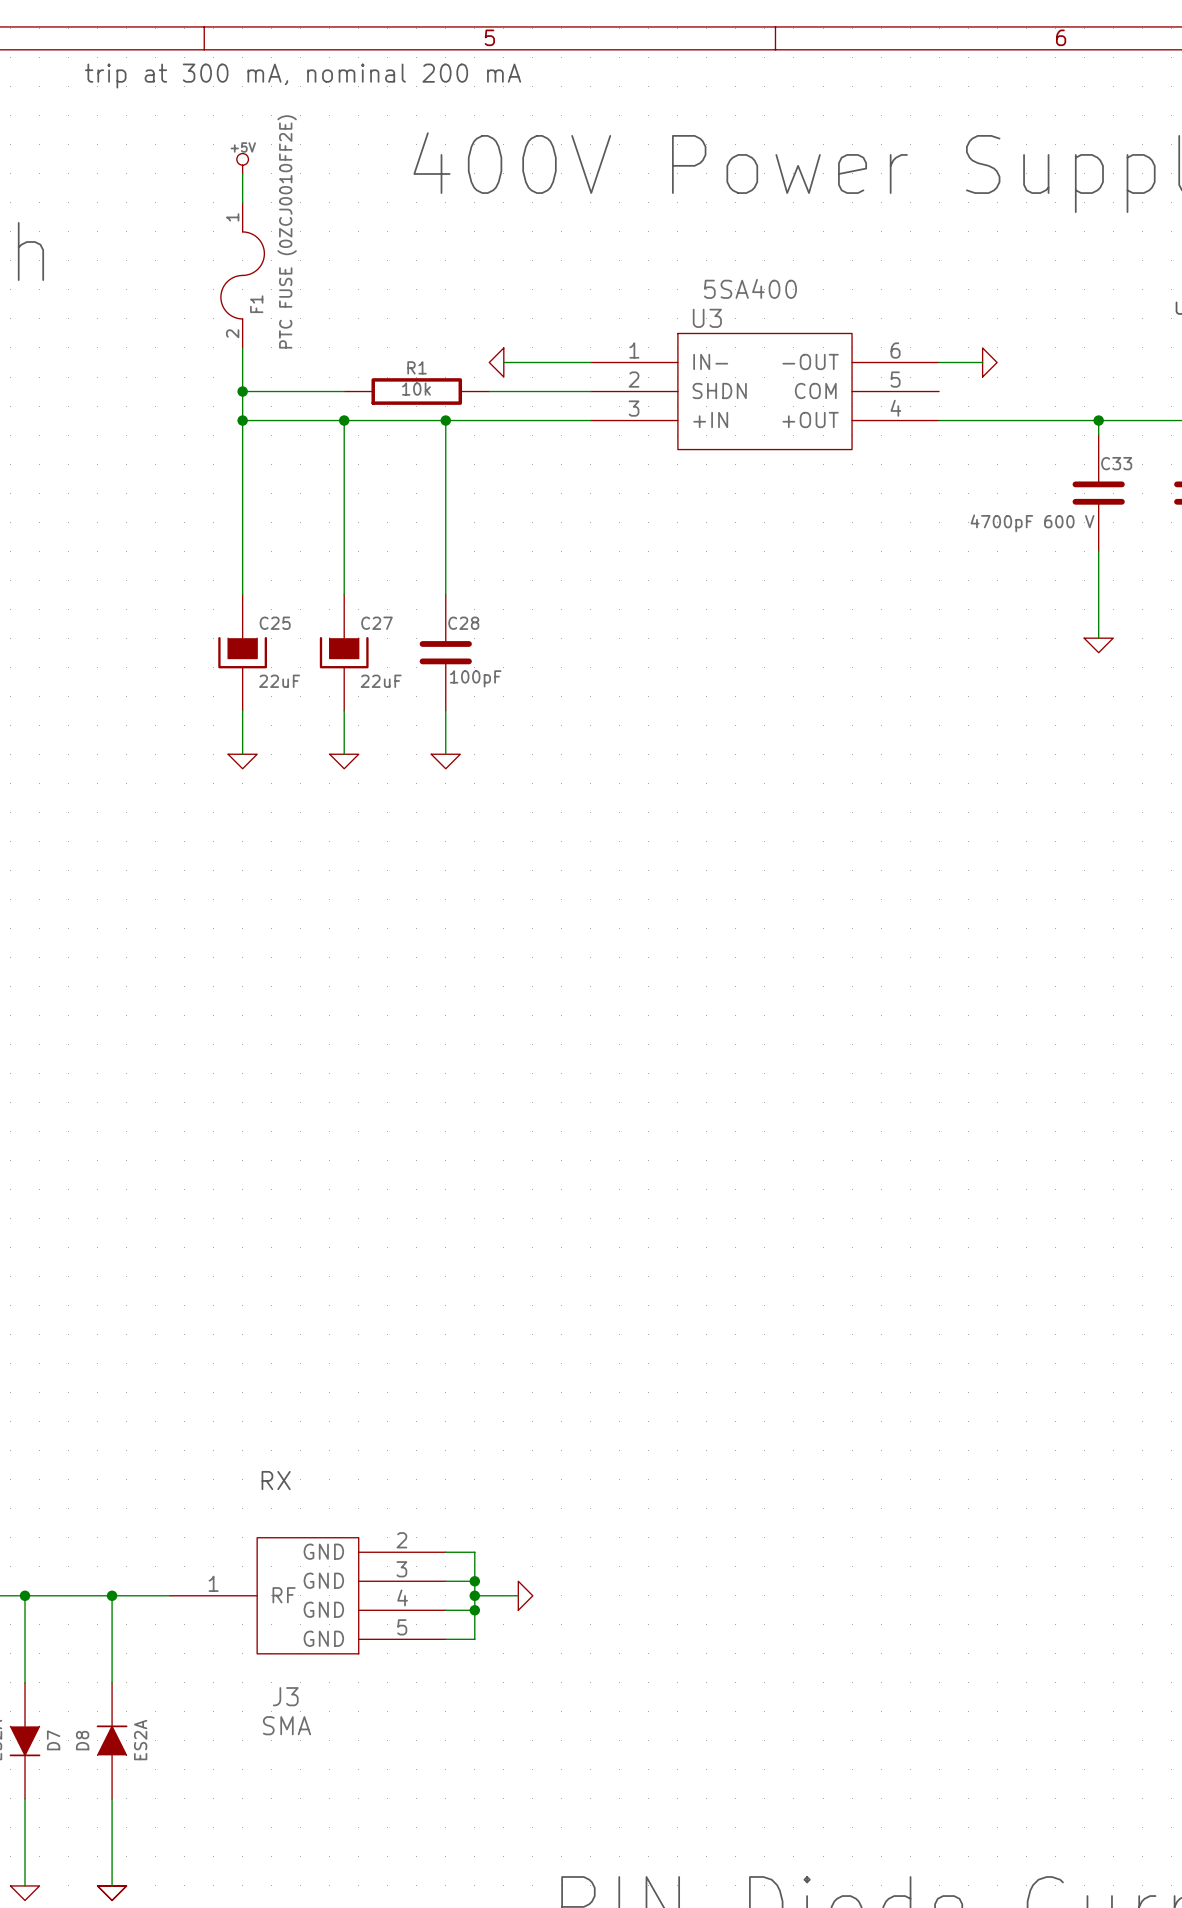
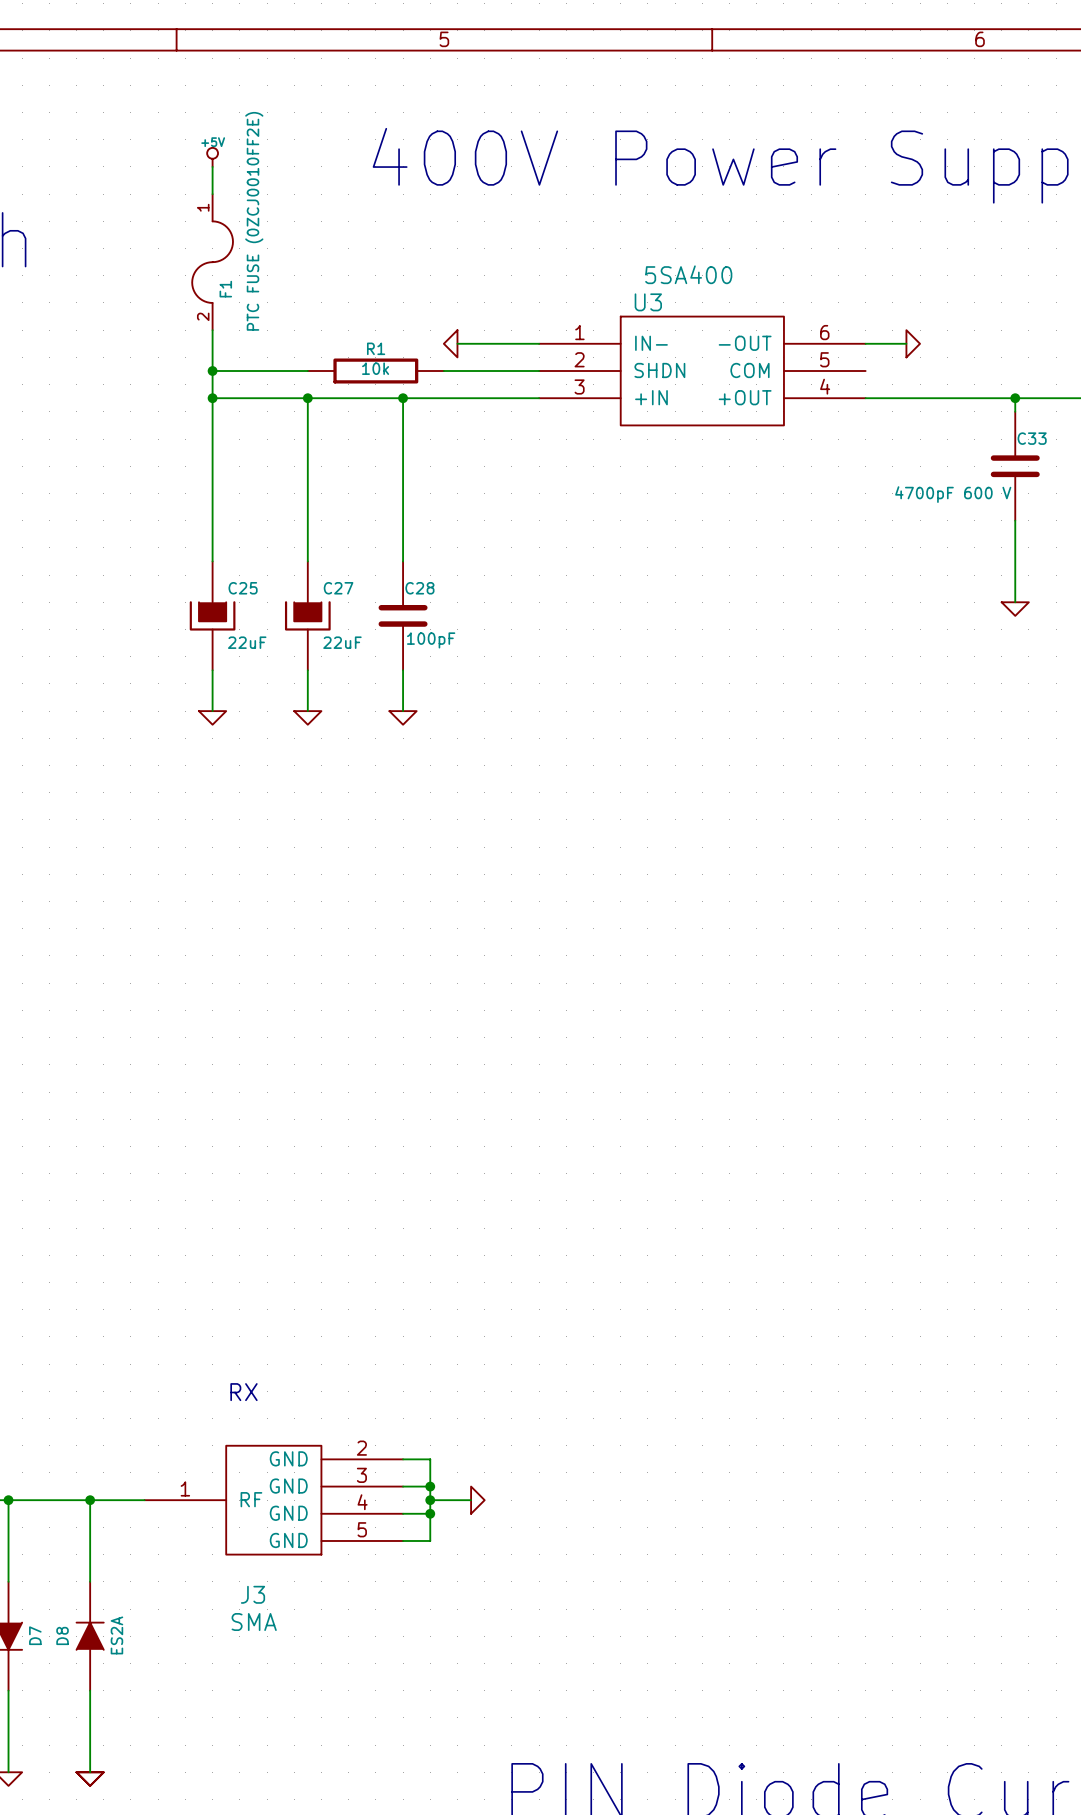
text: trip at 300 mA, nominal 200 mA (303, 76) -> none

